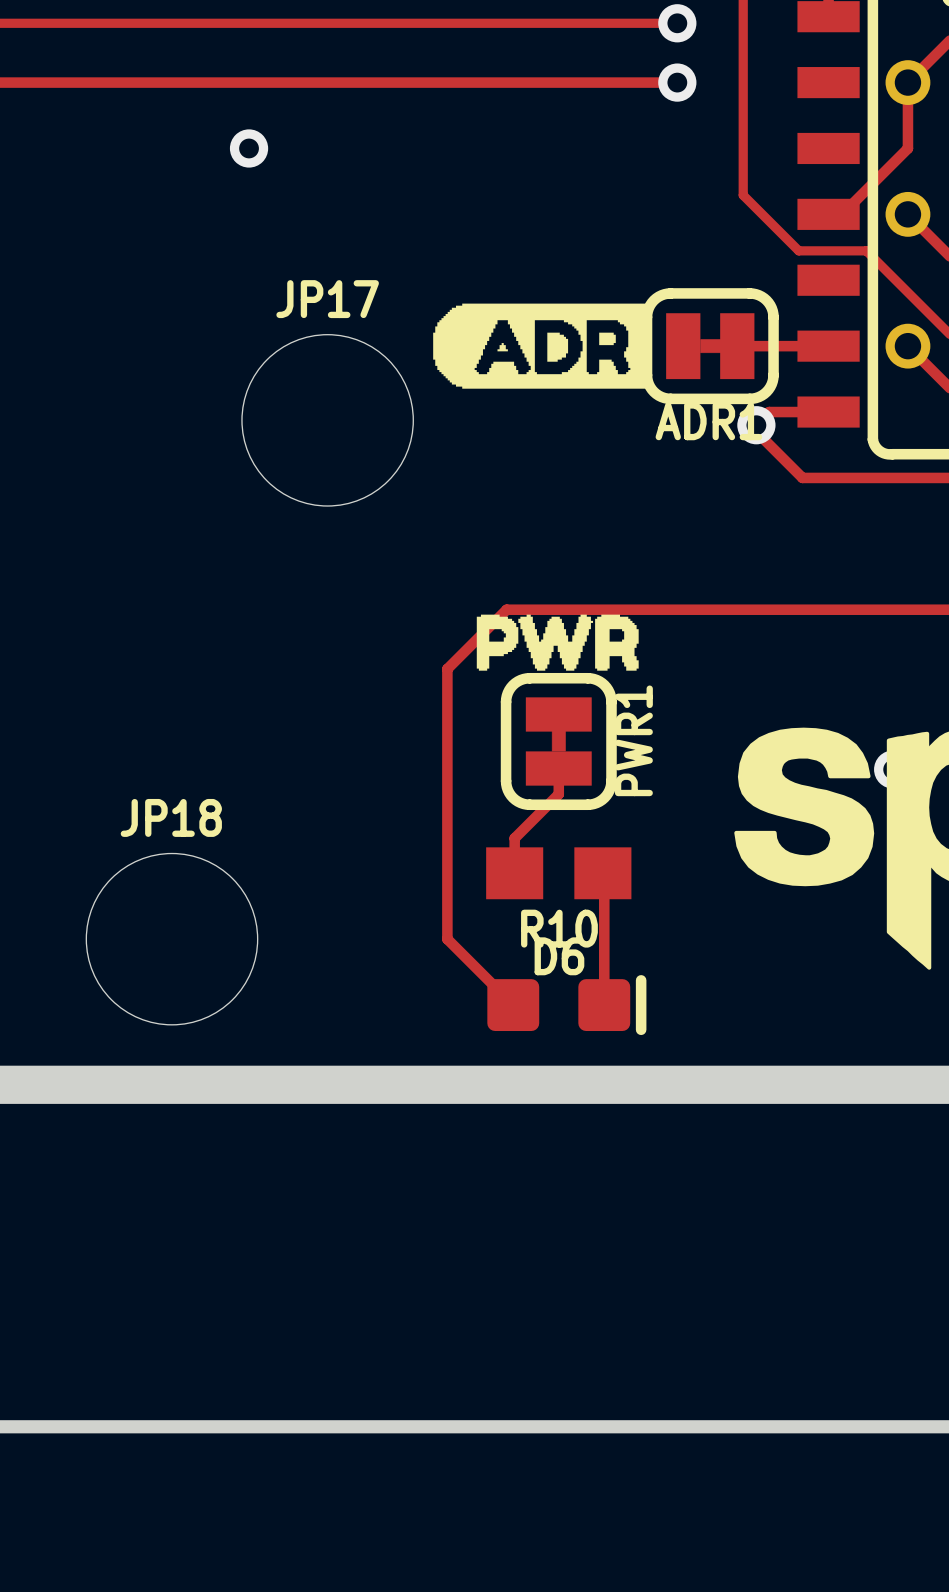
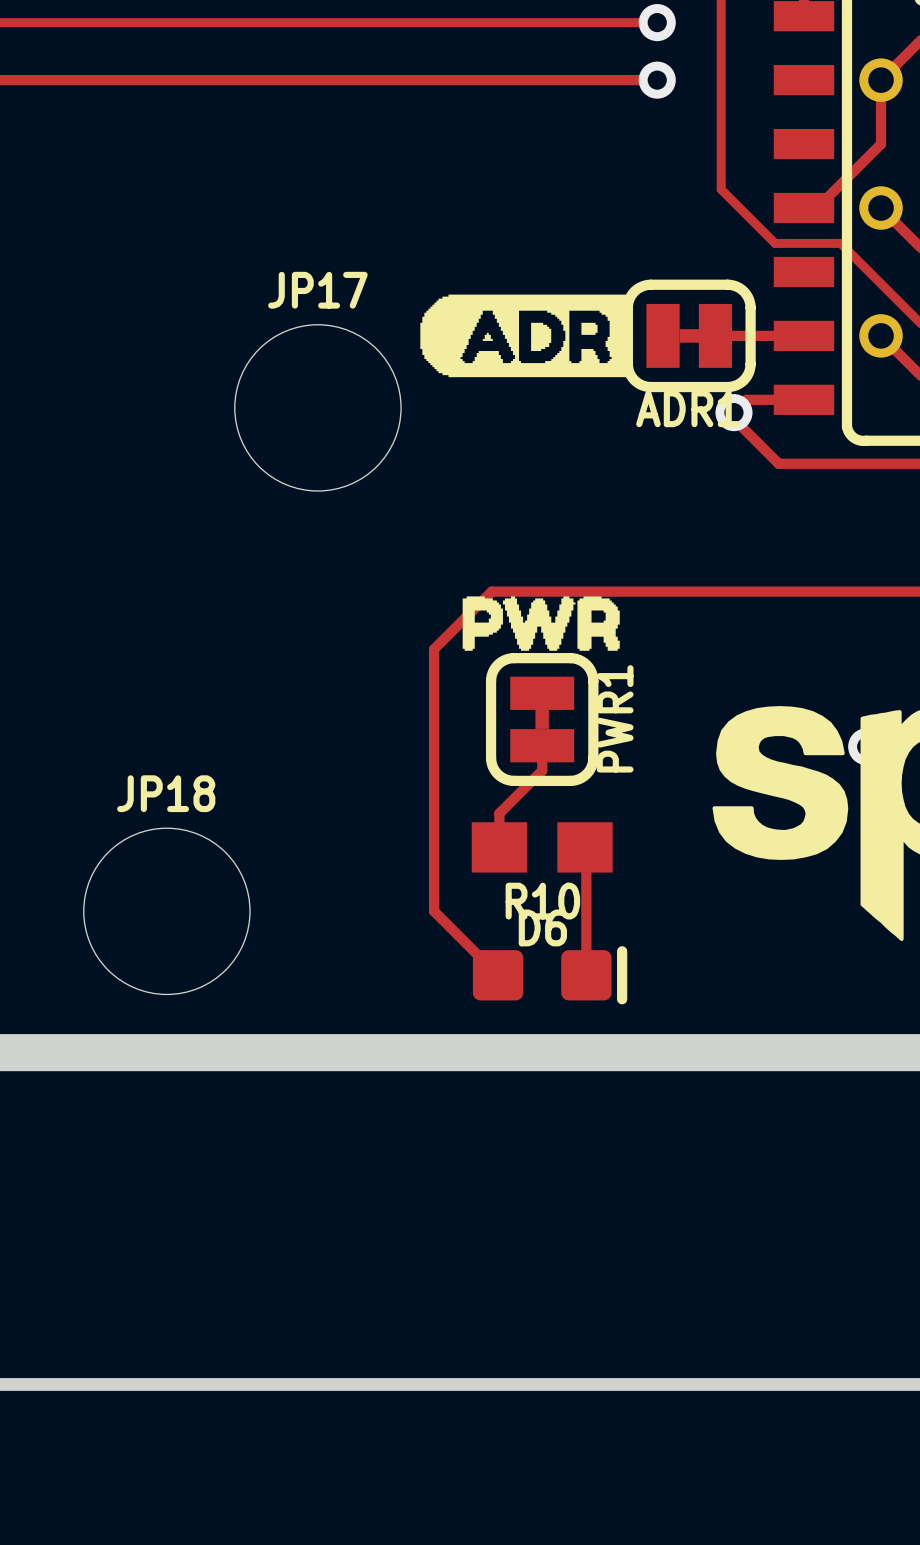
via: (249, 148) -> none

